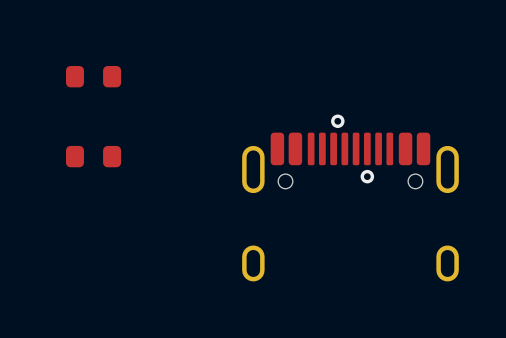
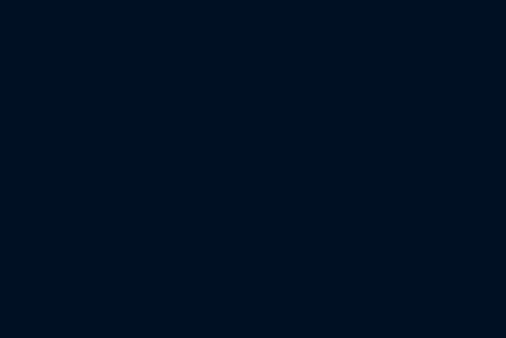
part: (93, 76) -> none
via: (337, 121) -> none
part: (93, 156) -> none
via: (367, 176) -> none
part: (350, 207) -> none

